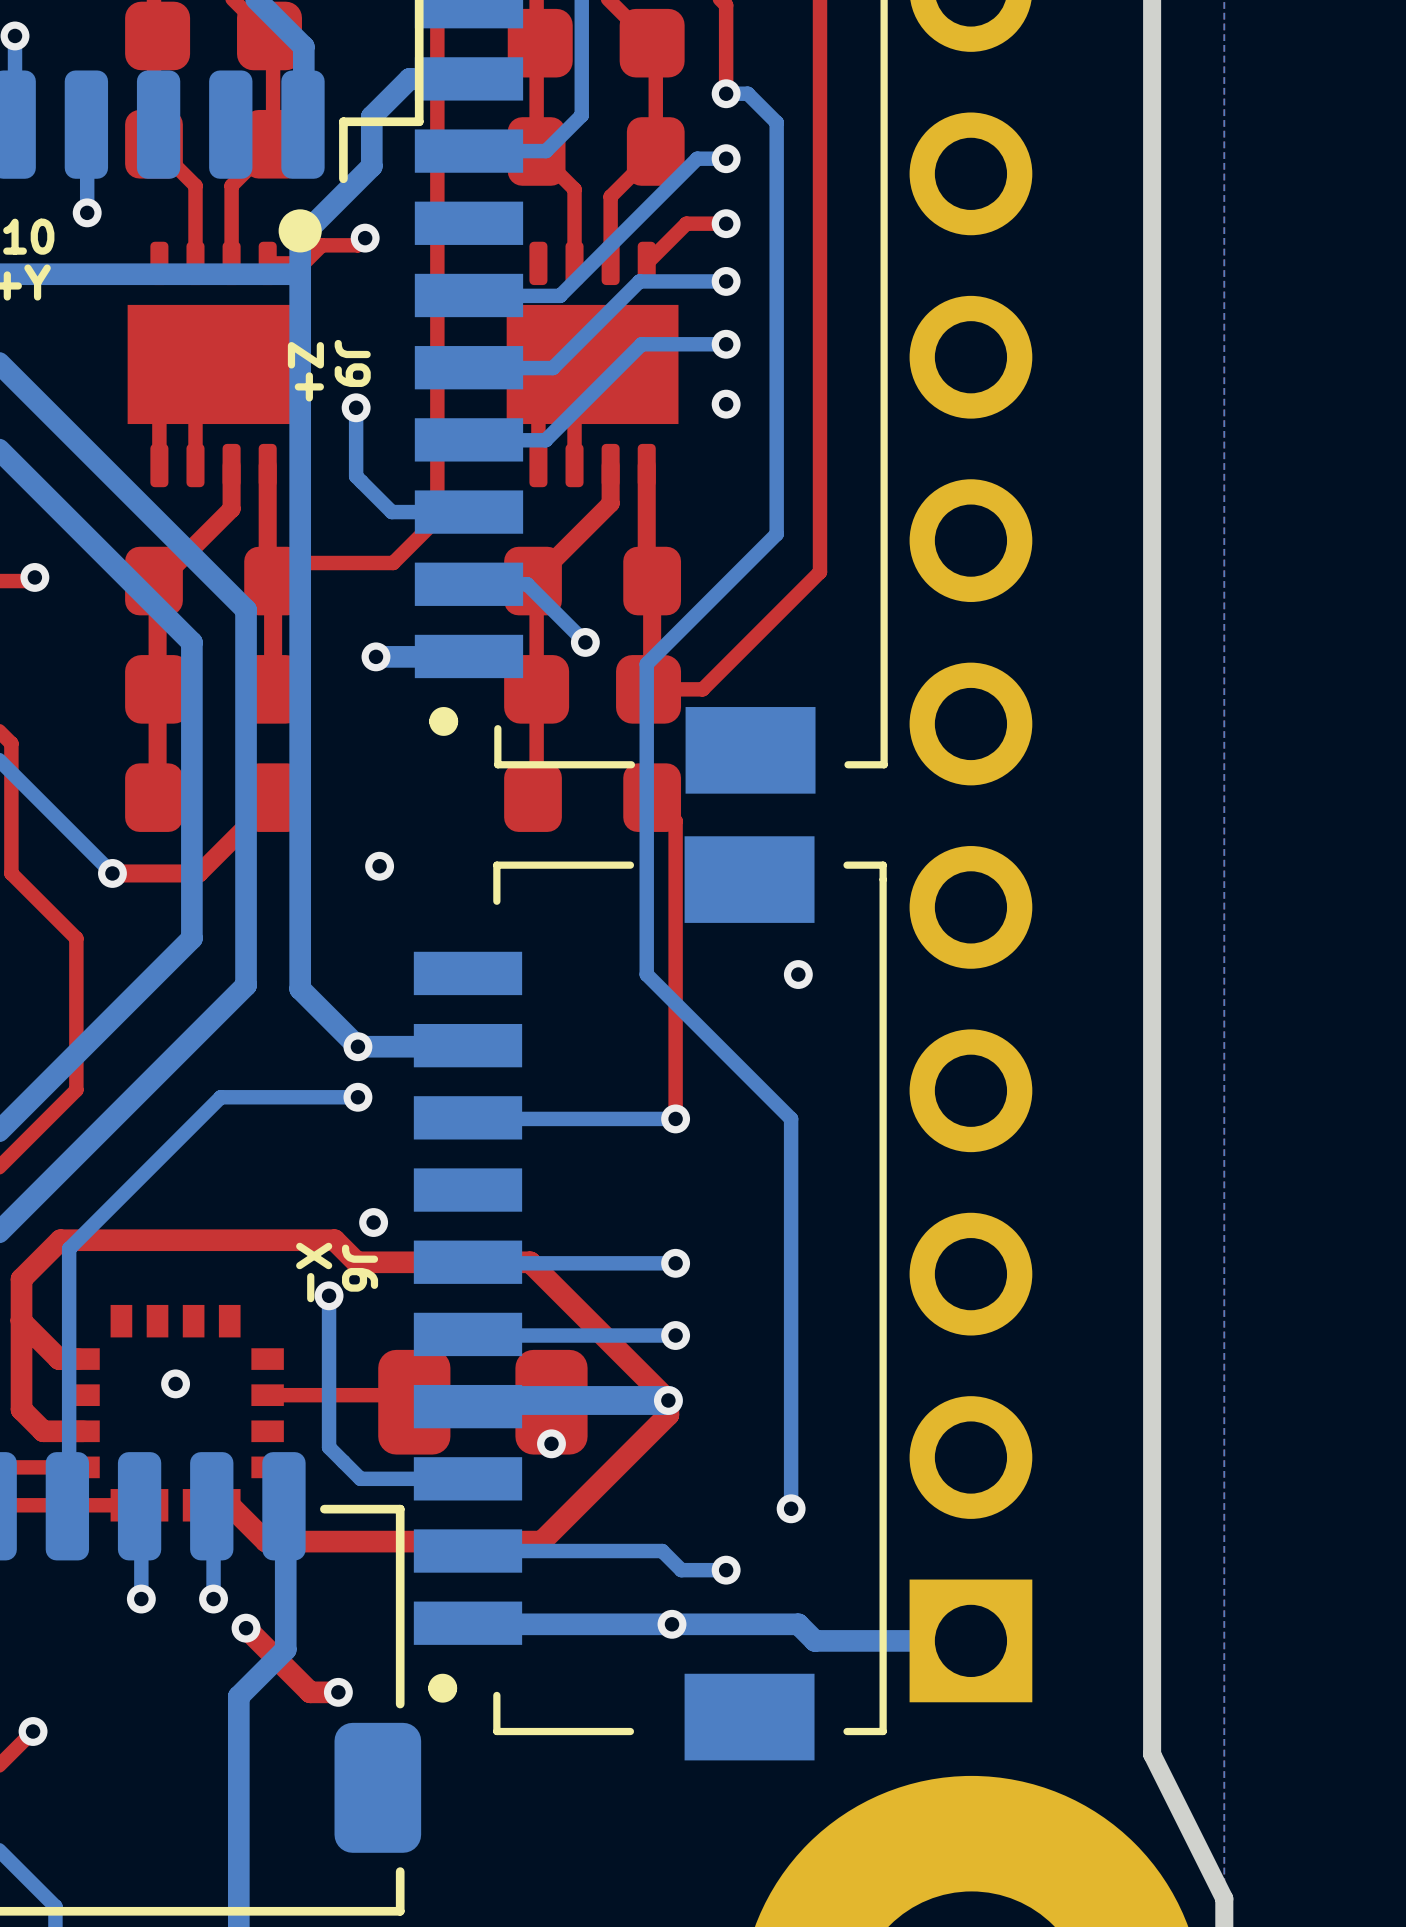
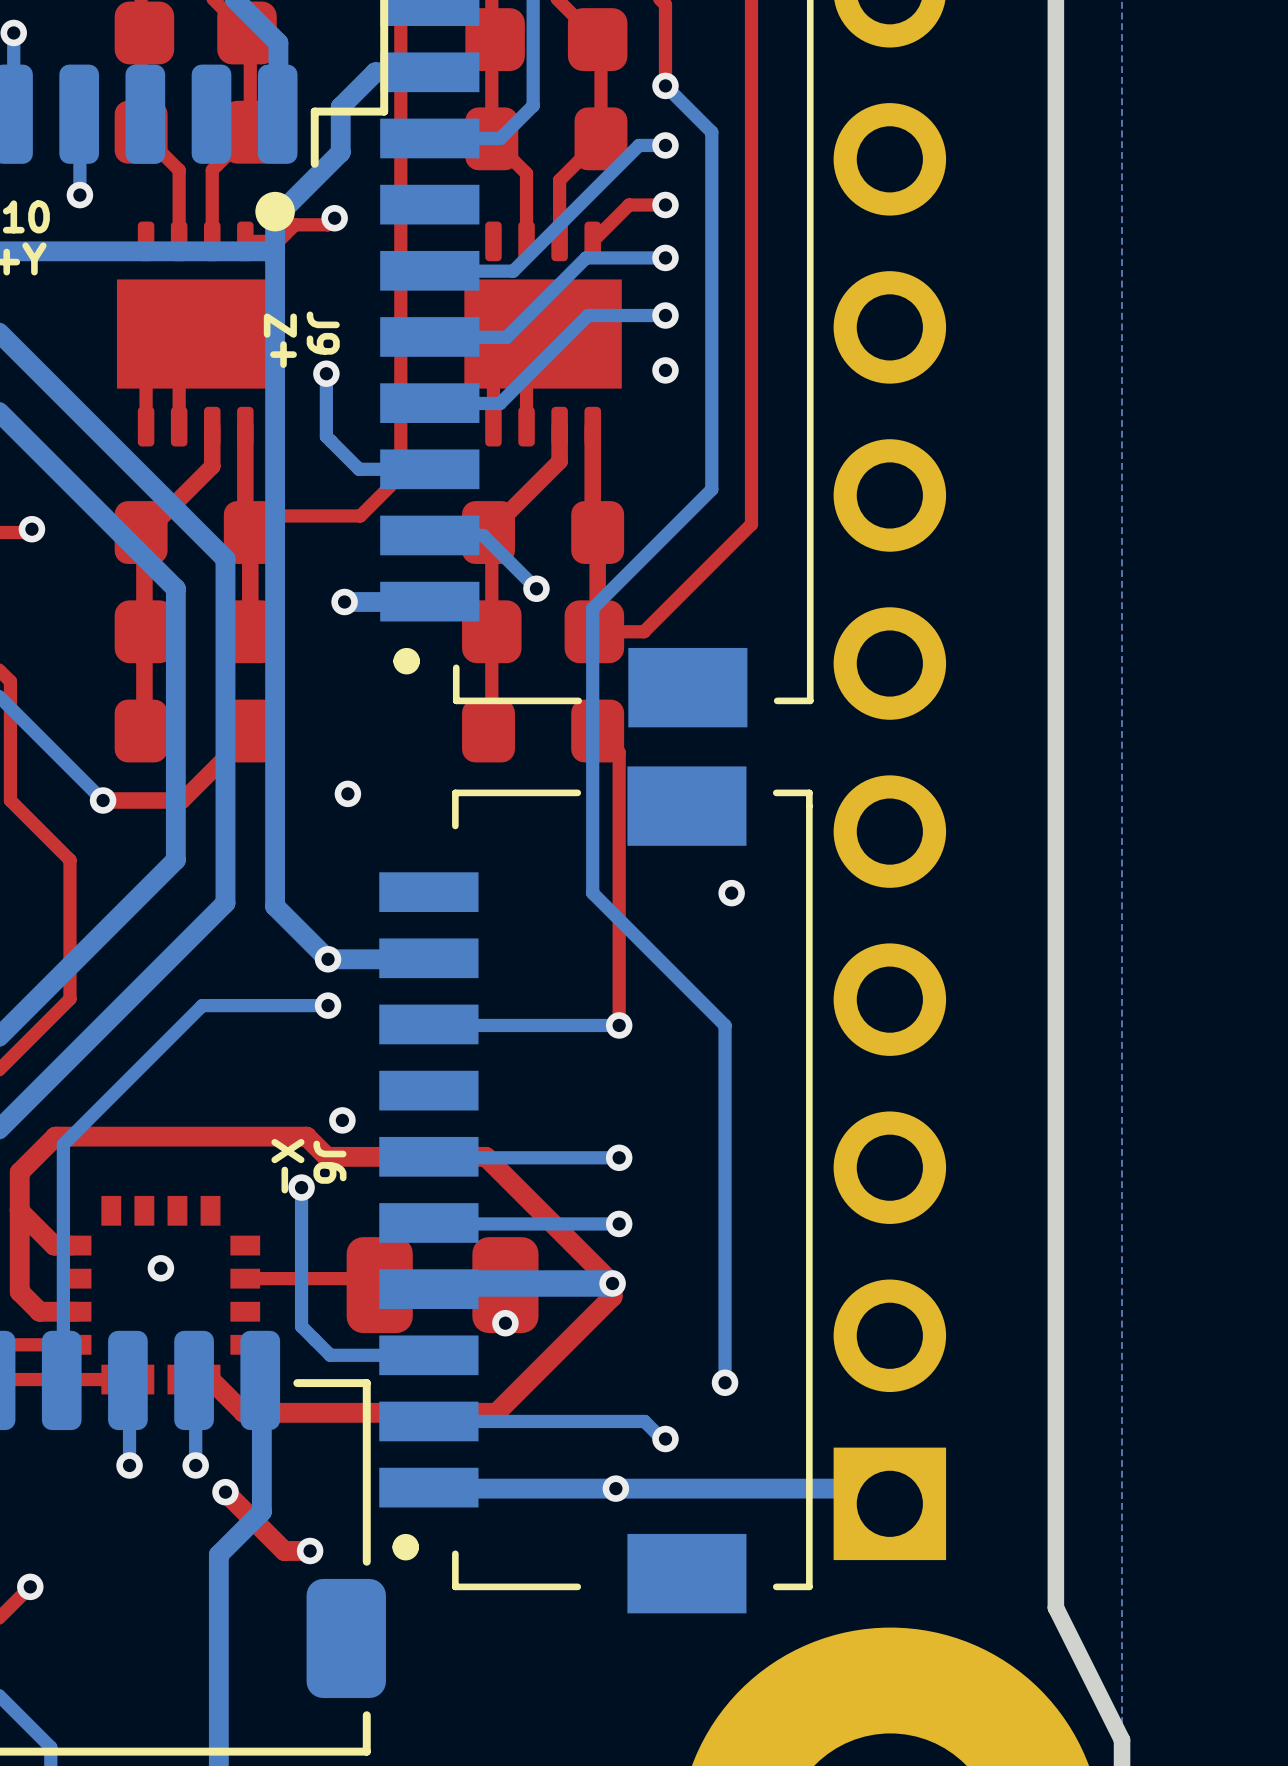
bottom track: (726, 93) (747, 93) (776, 122) (776, 144) -> (665, 85) (711, 132)
bottom track: (662, 1551) (681, 1570) (722, 1570) -> (606, 1421) (644, 1421) (662, 1439)
bottom track: (798, 1624) (814, 1640) (971, 1640) -> (731, 1488) (875, 1488) (890, 1503)

